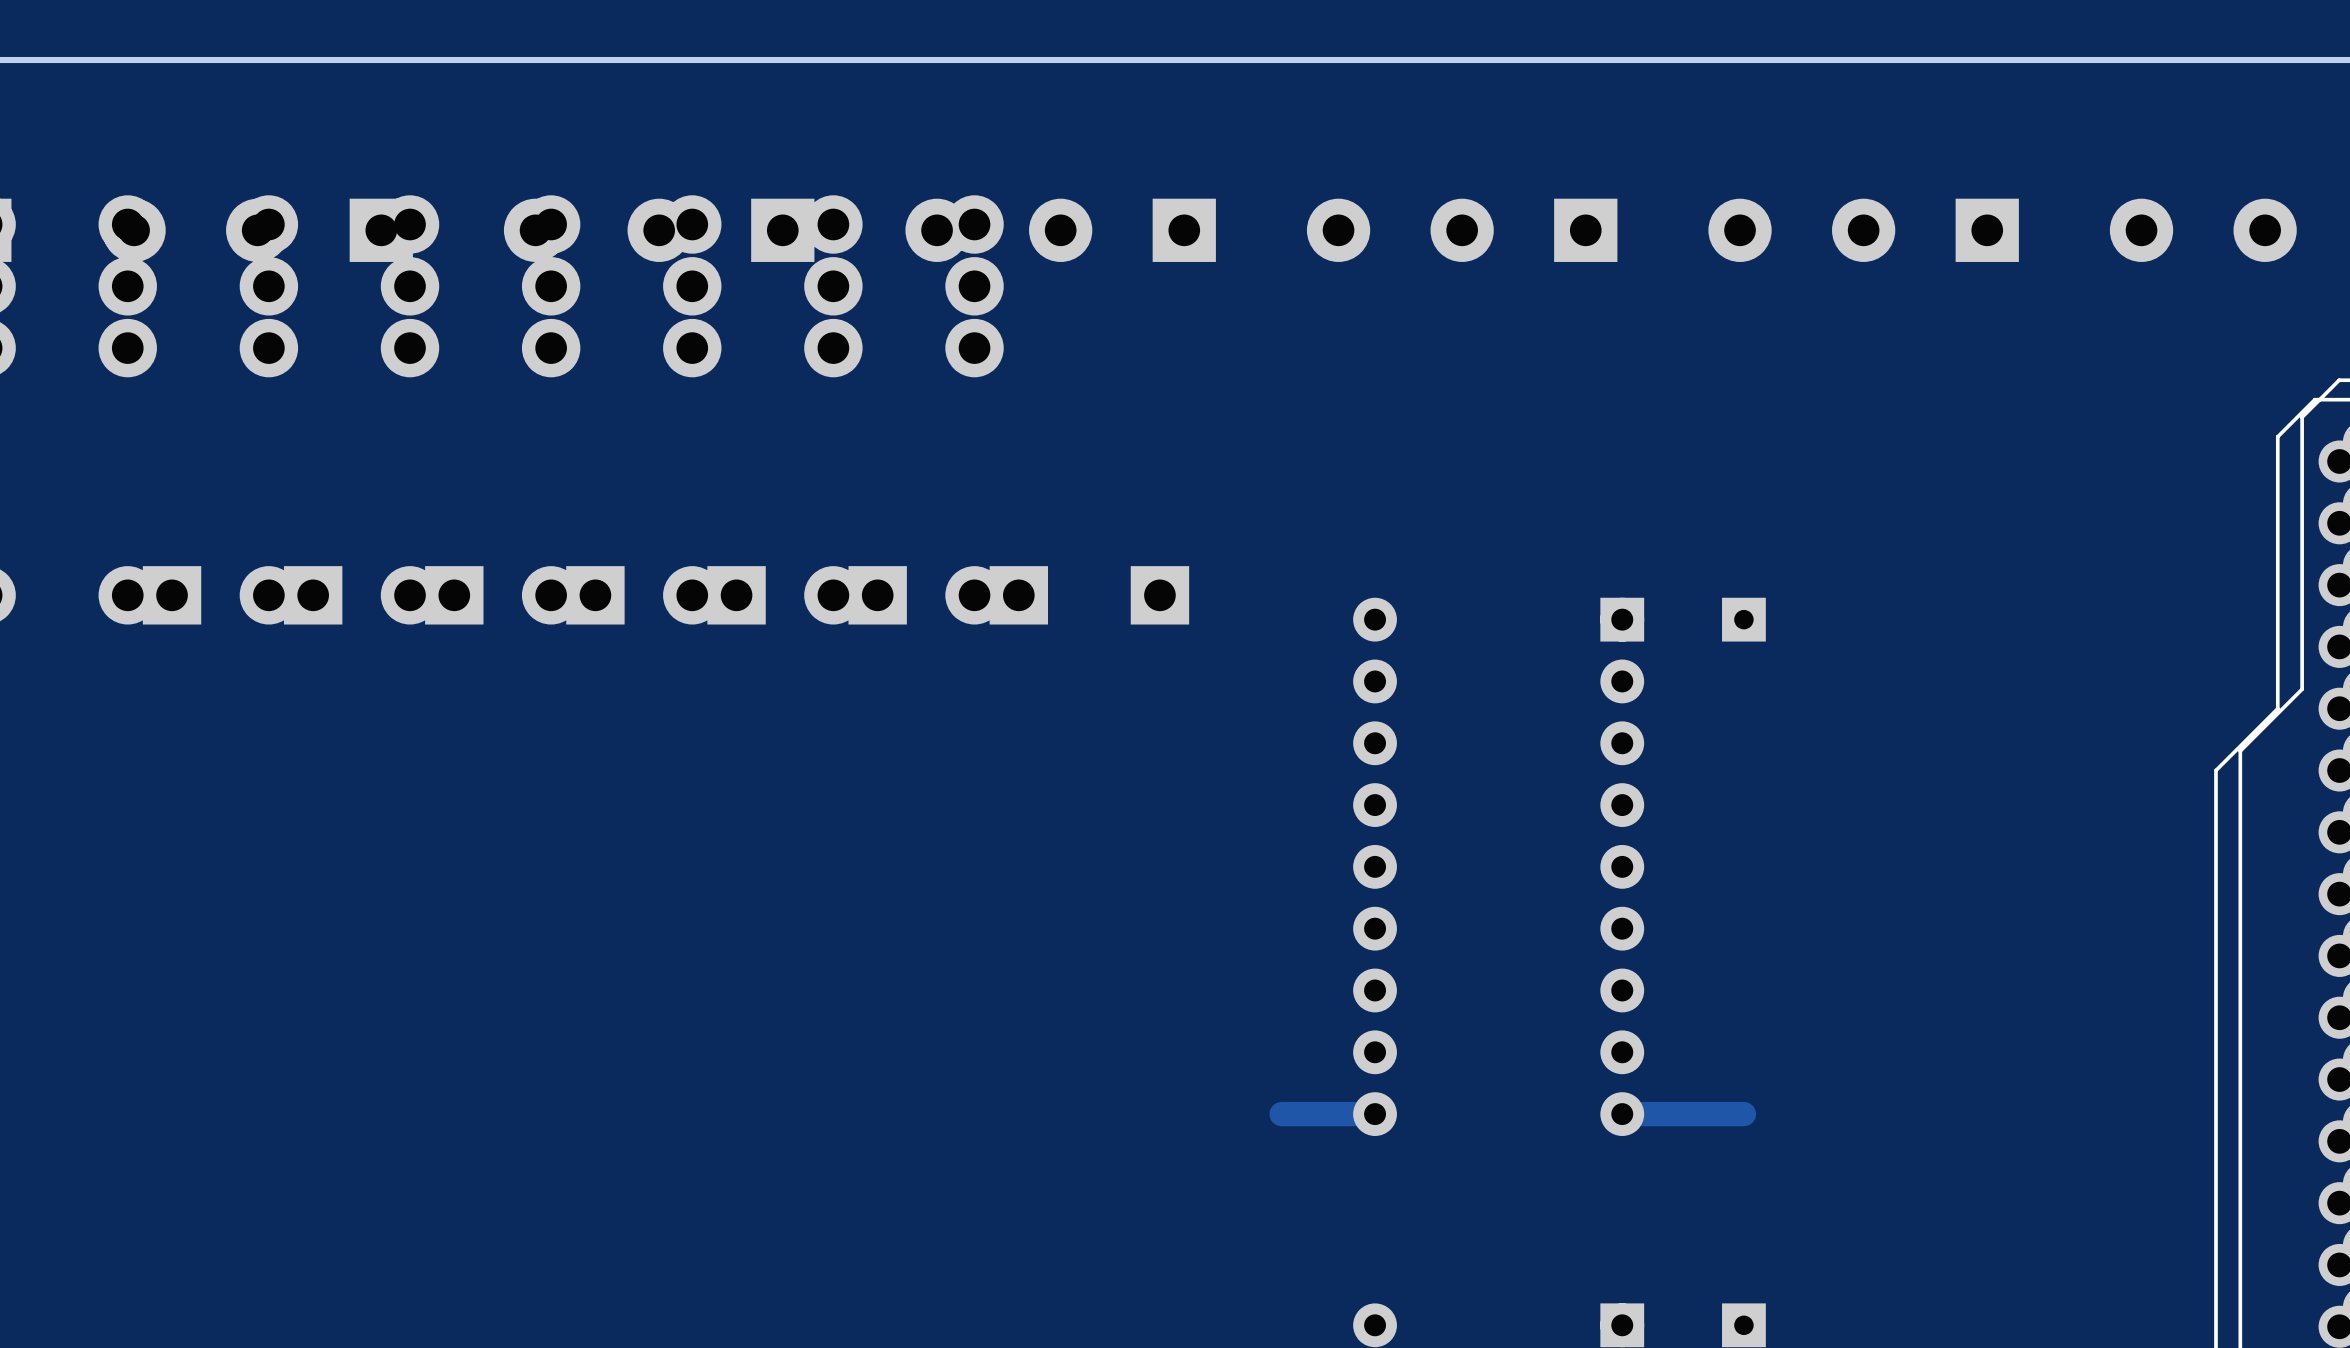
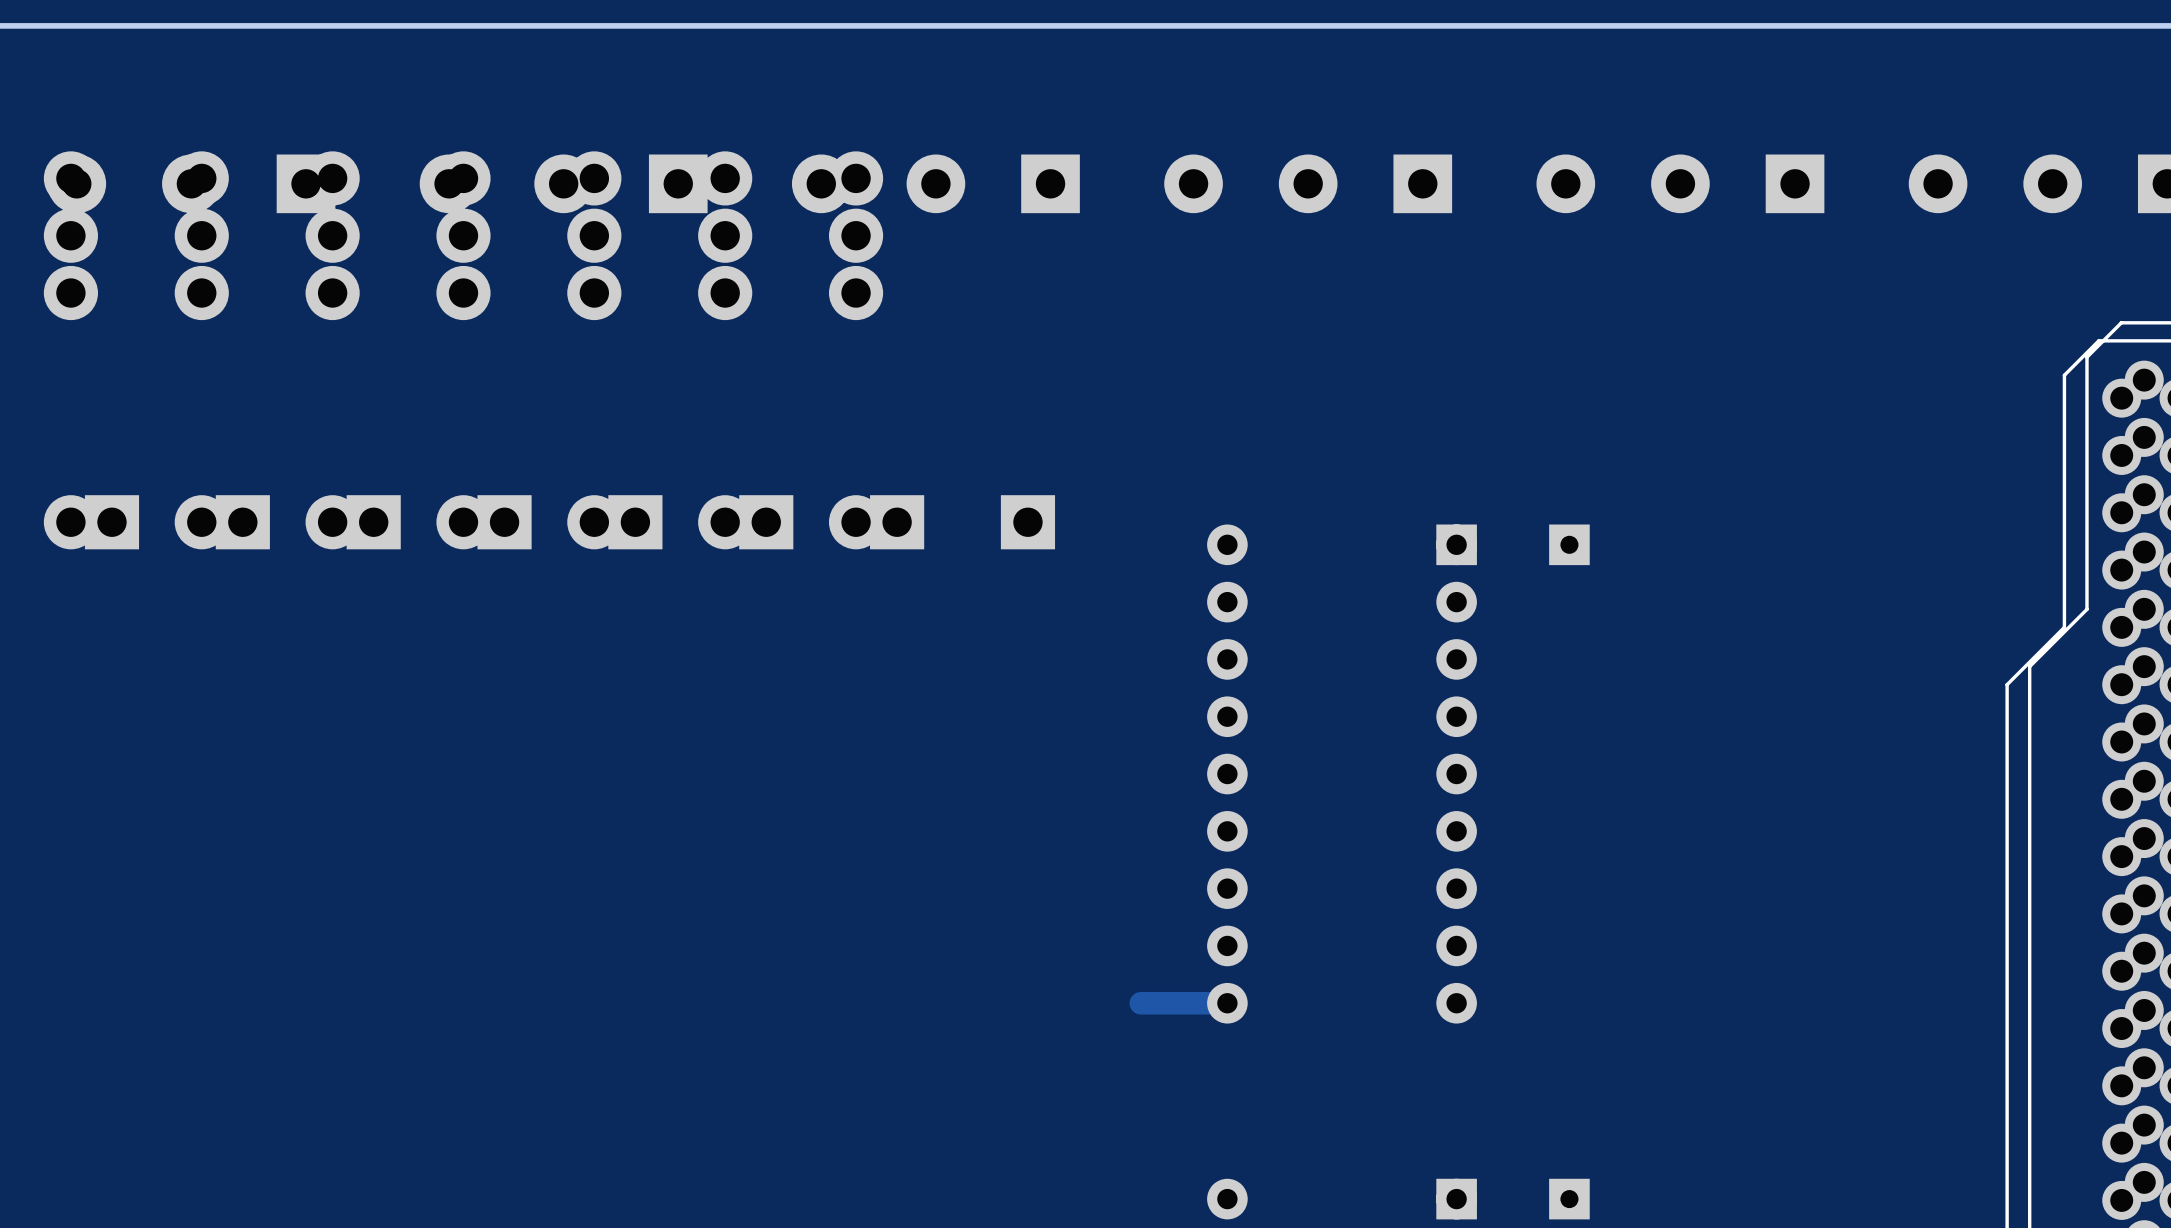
track: (1743, 1114) (1622, 1114) -> none

